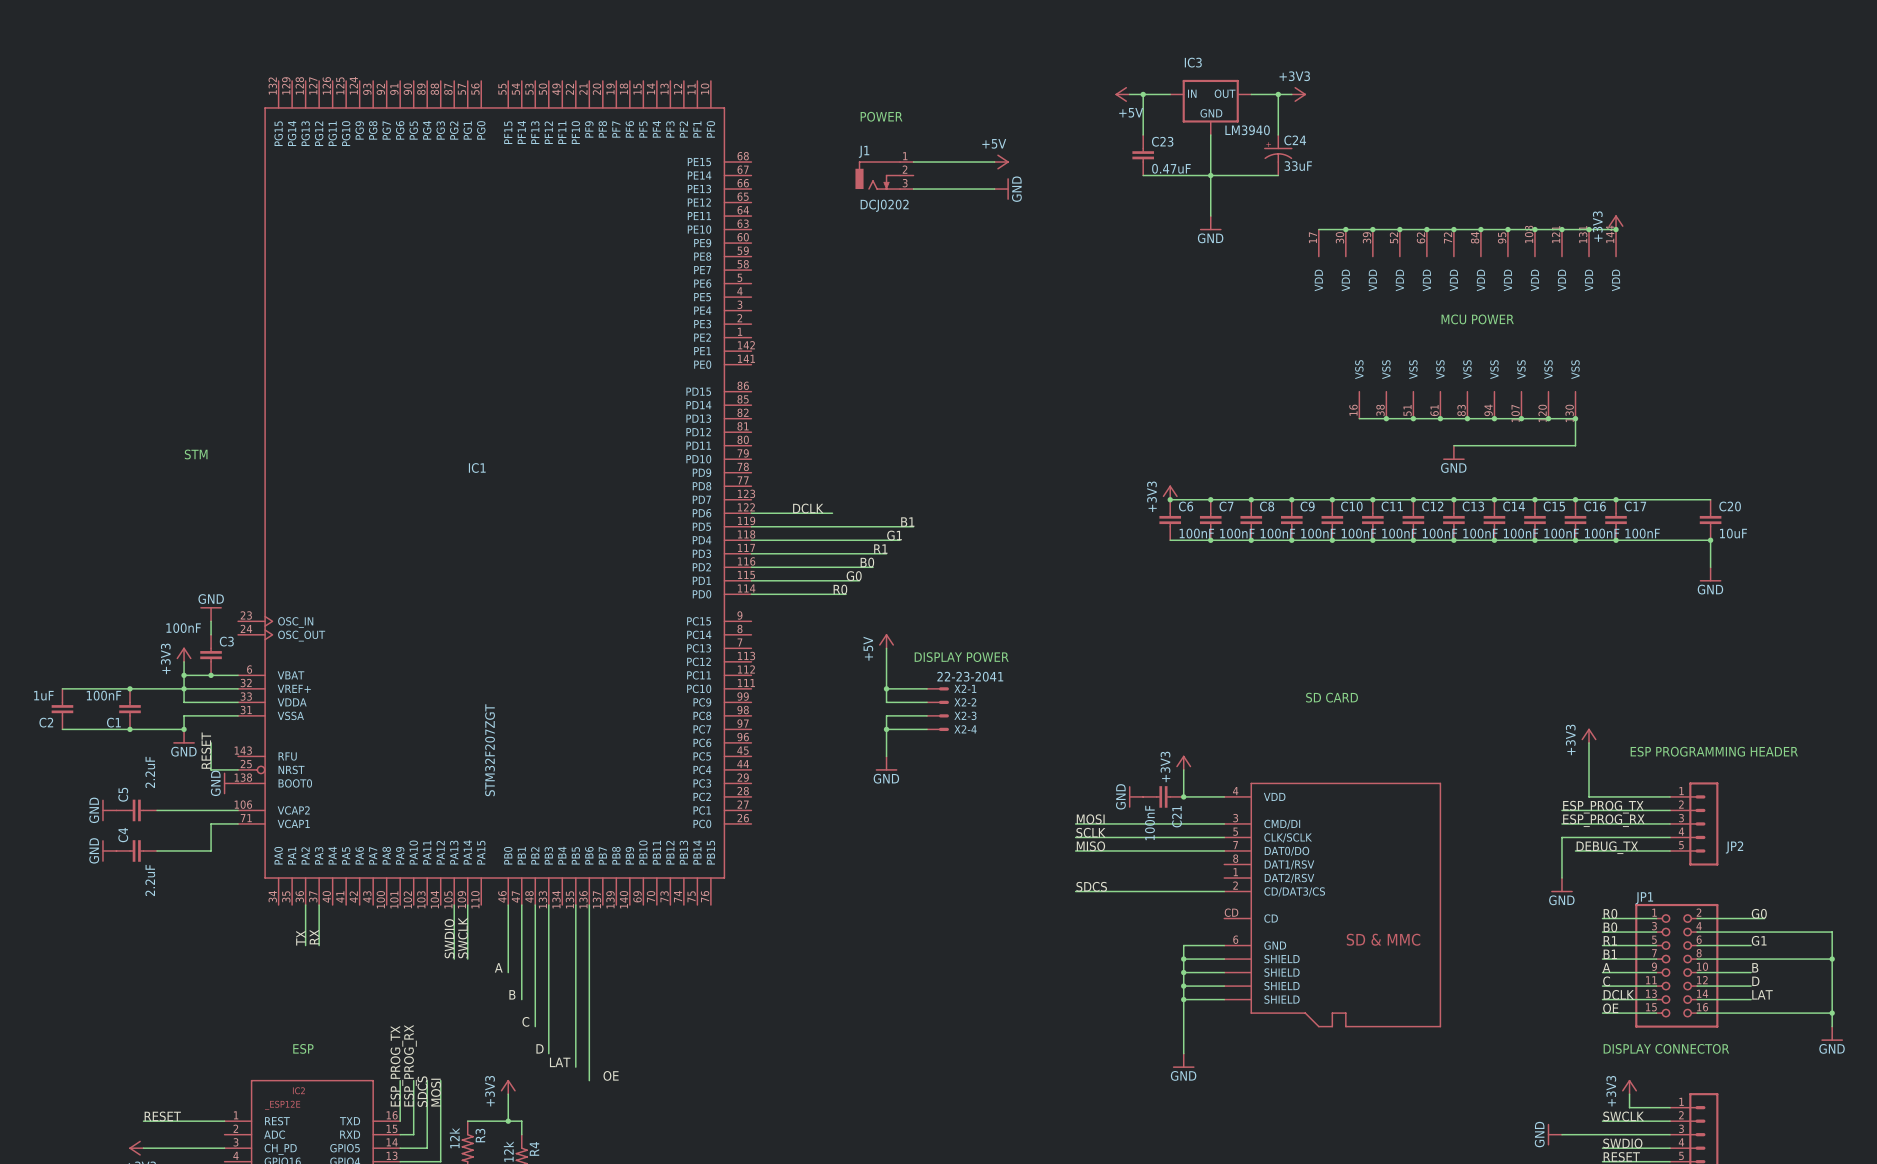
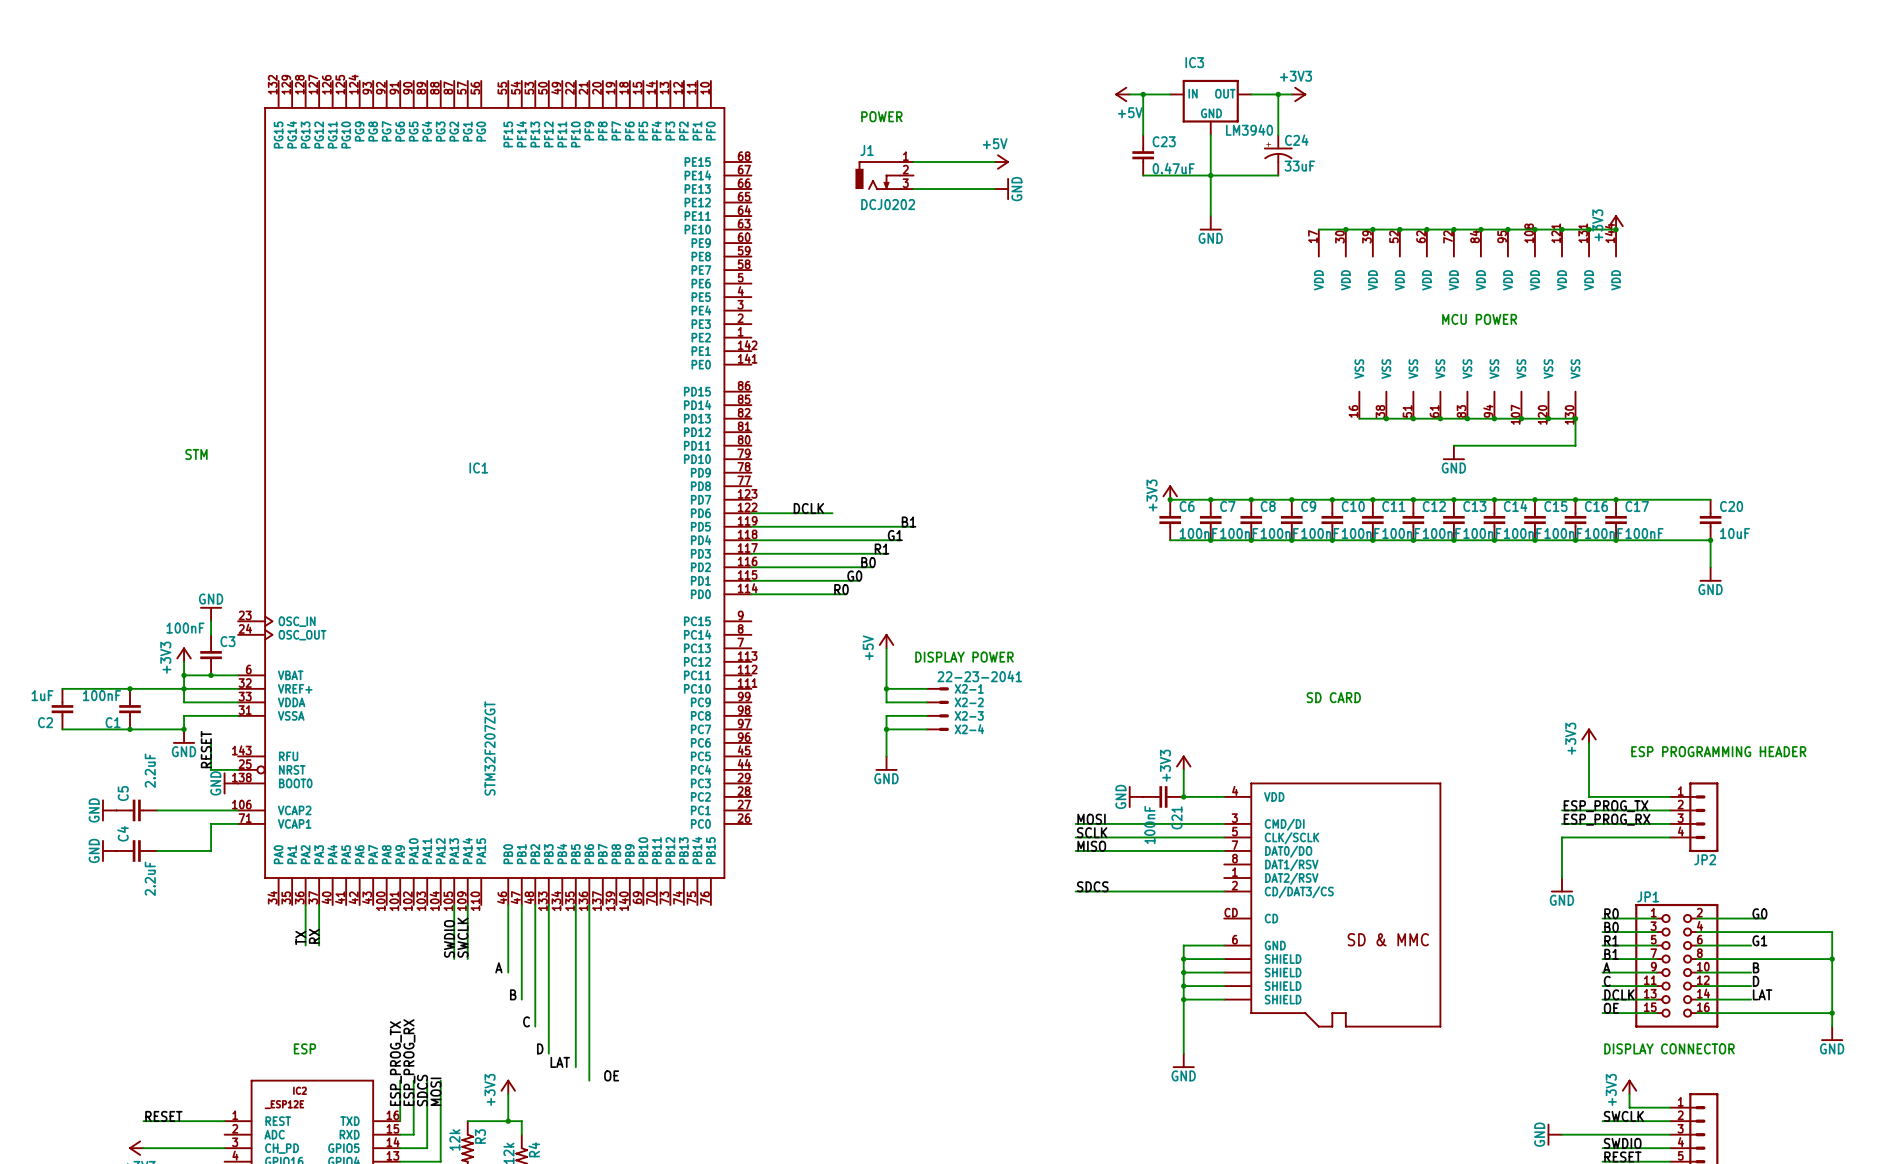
JP2 symbol: [1670, 782, 1719, 866] -> [1670, 782, 1719, 853]
label: DEBUG_TX (1607, 847) -> none
JP2 name position: JP2 (1734, 847) -> JP2 (1705, 859)
wire: (1575, 850) (1670, 850) -> none

